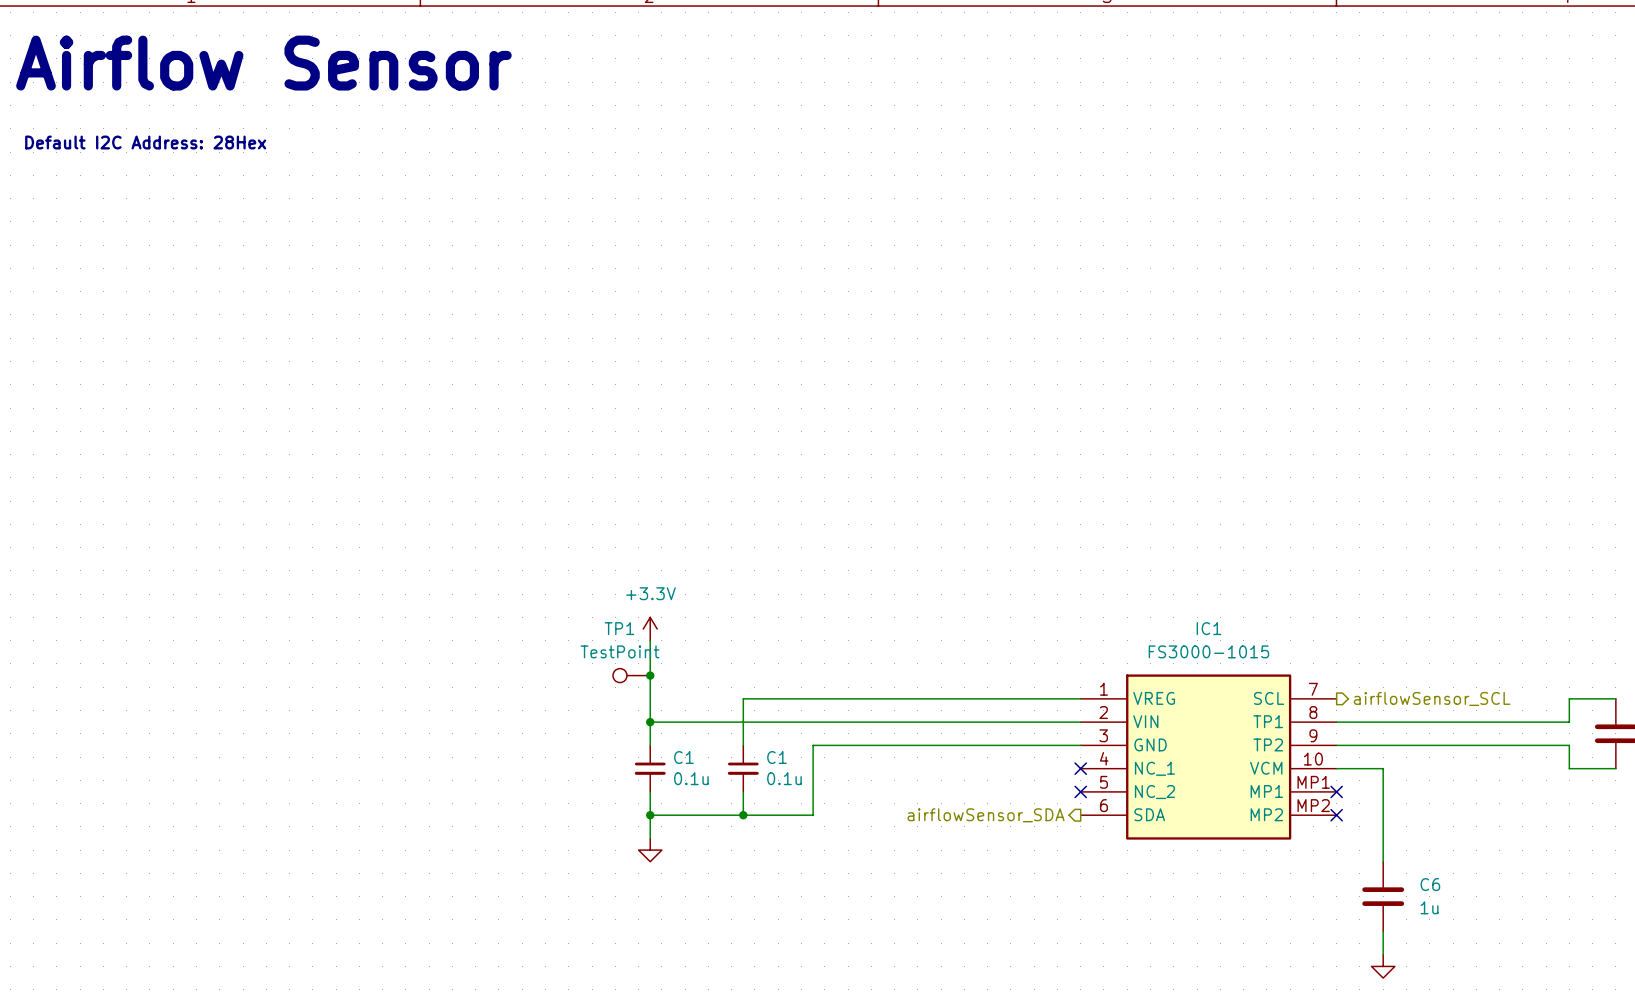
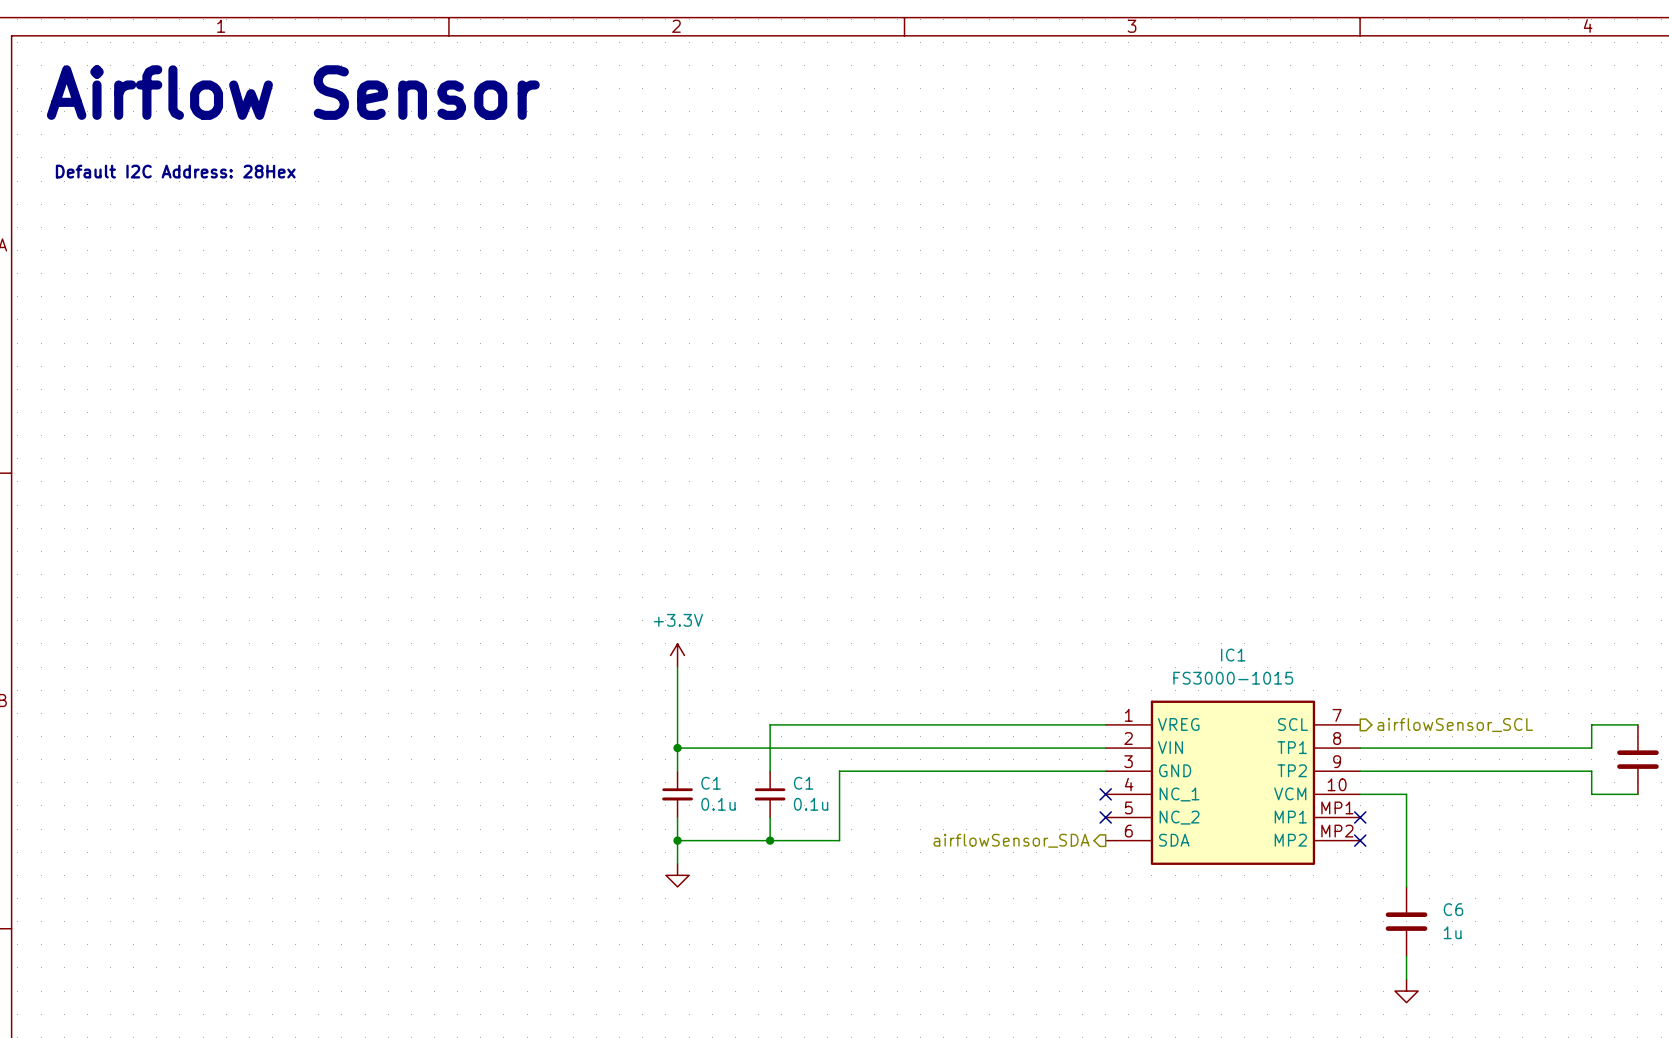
TP1: TestPoint (631, 675) -> none
junction: (650, 675) -> none

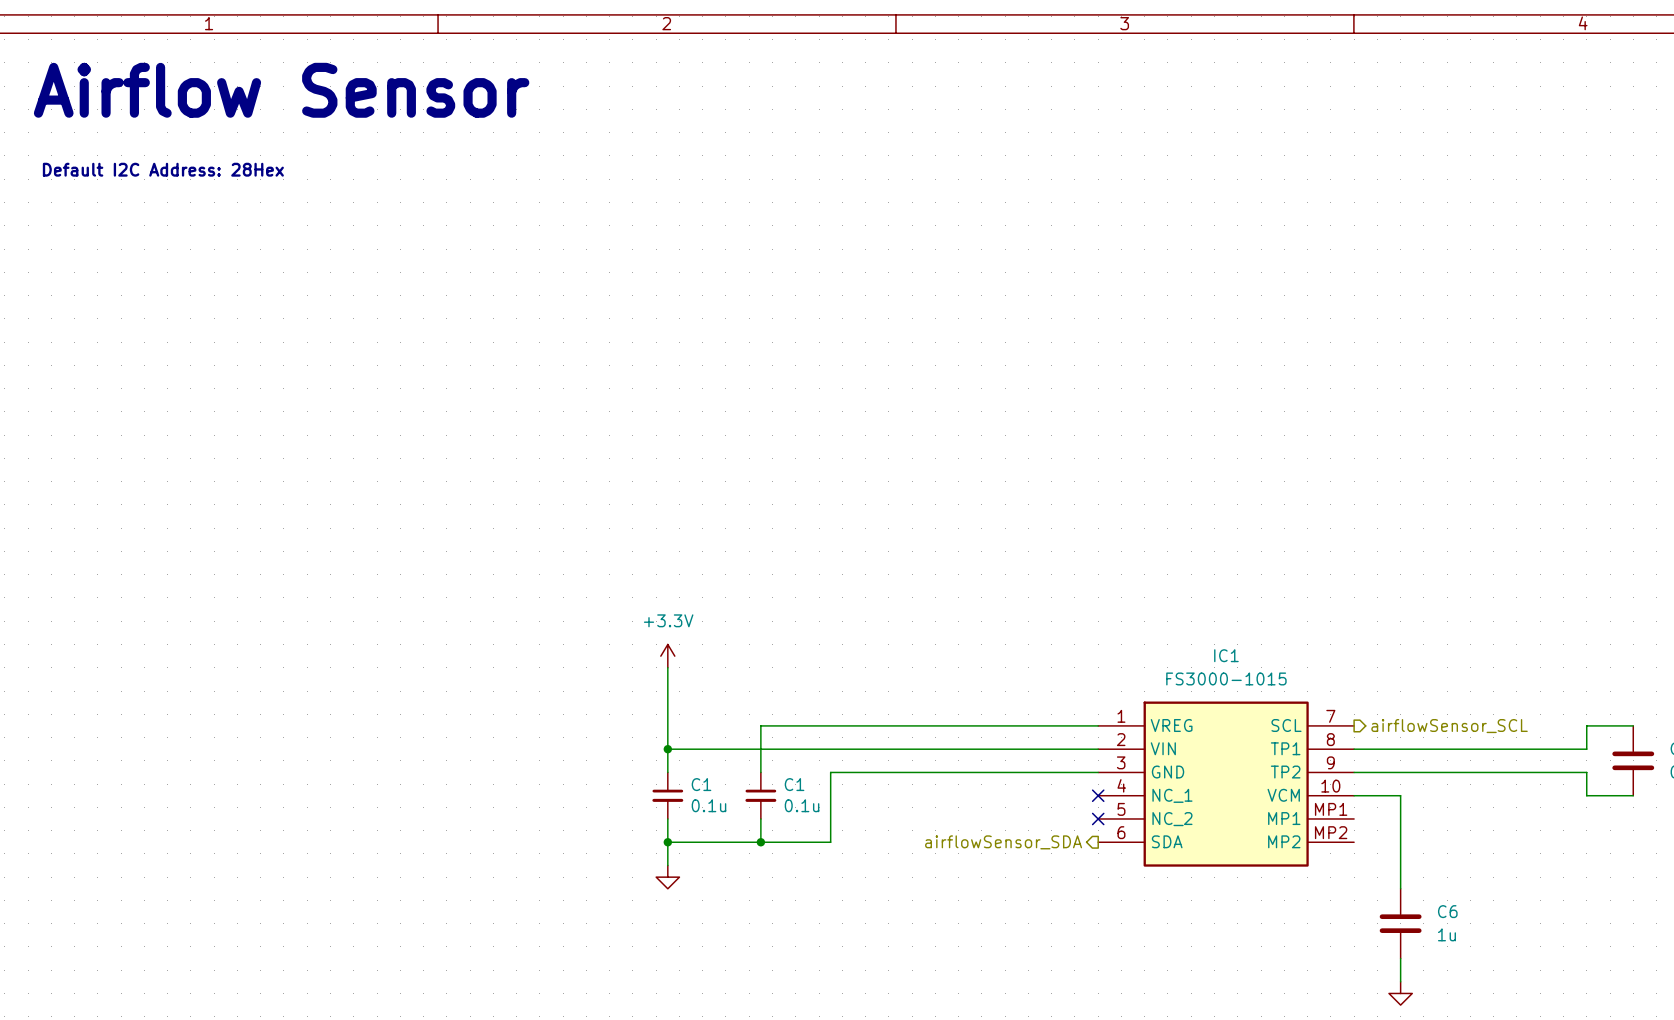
no-connect mark: (1360, 817) -> none
no-connect mark: (1360, 840) -> none

